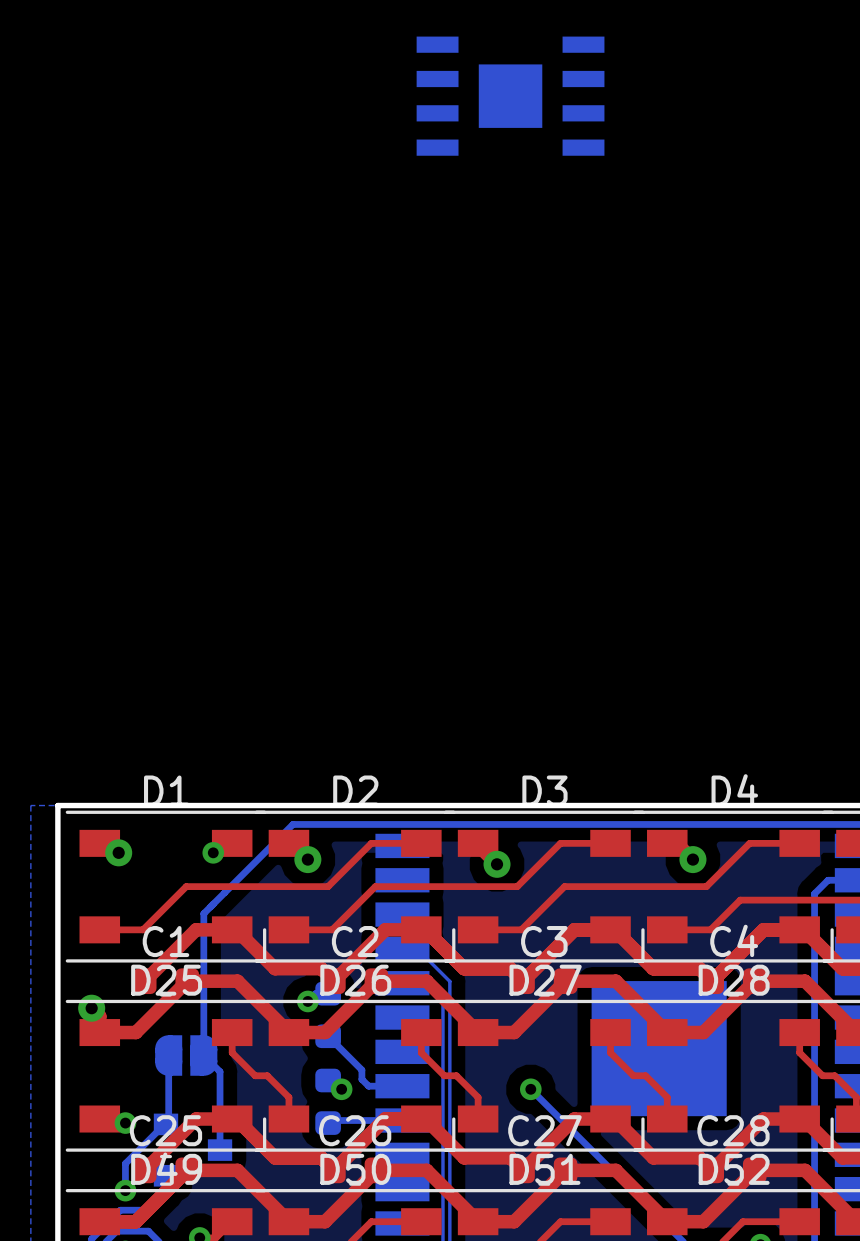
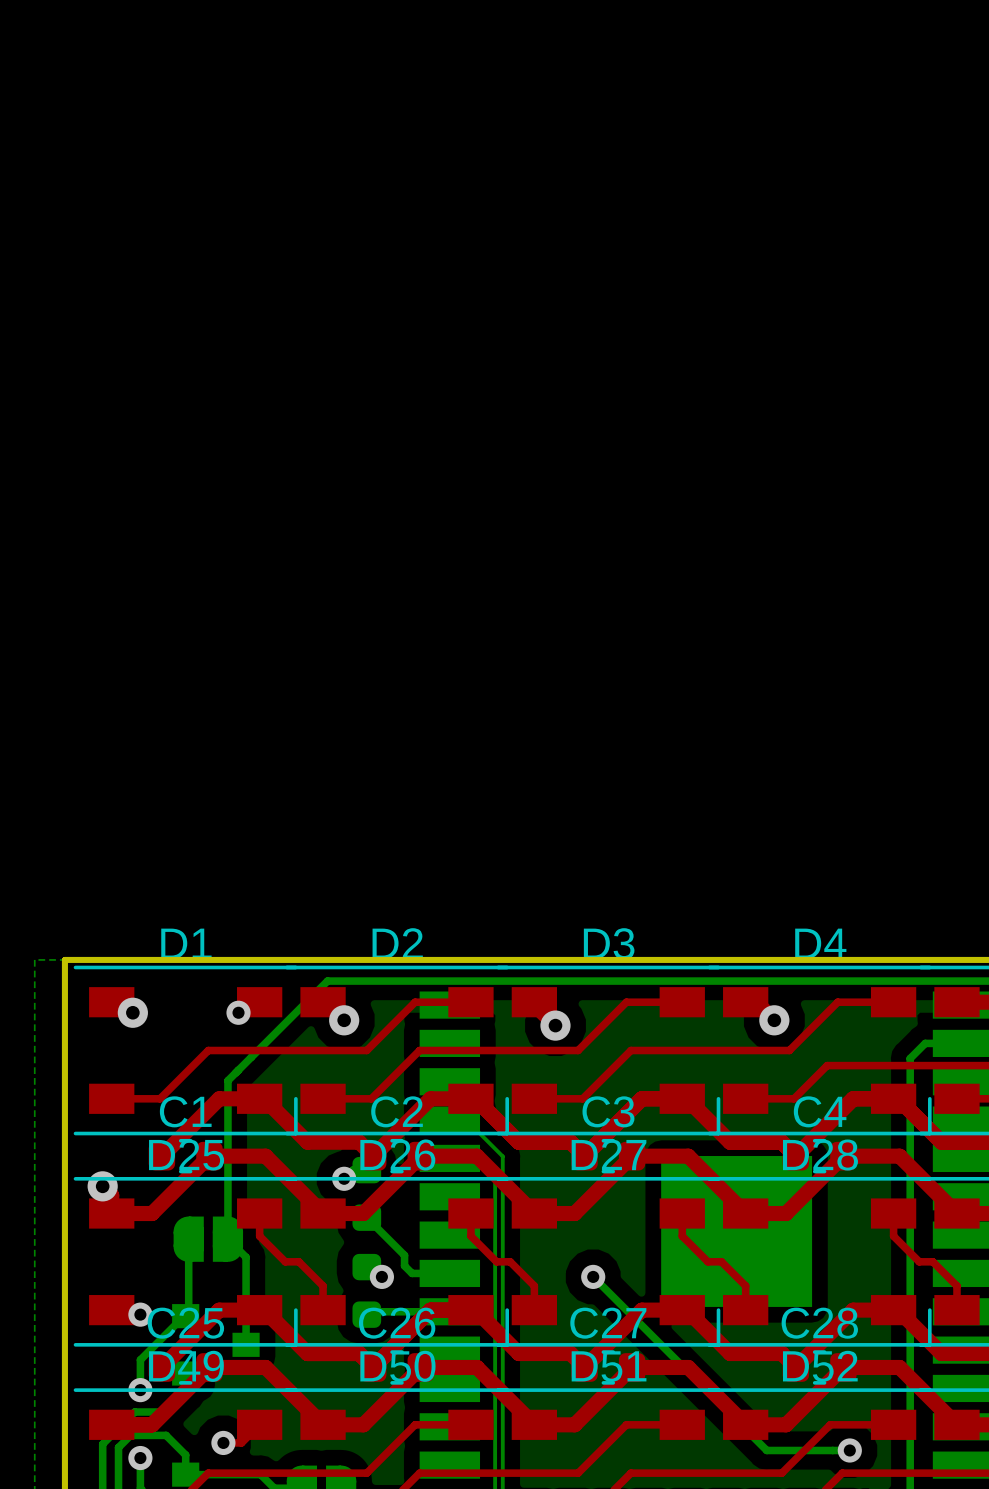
part: (510, 96) -> none

